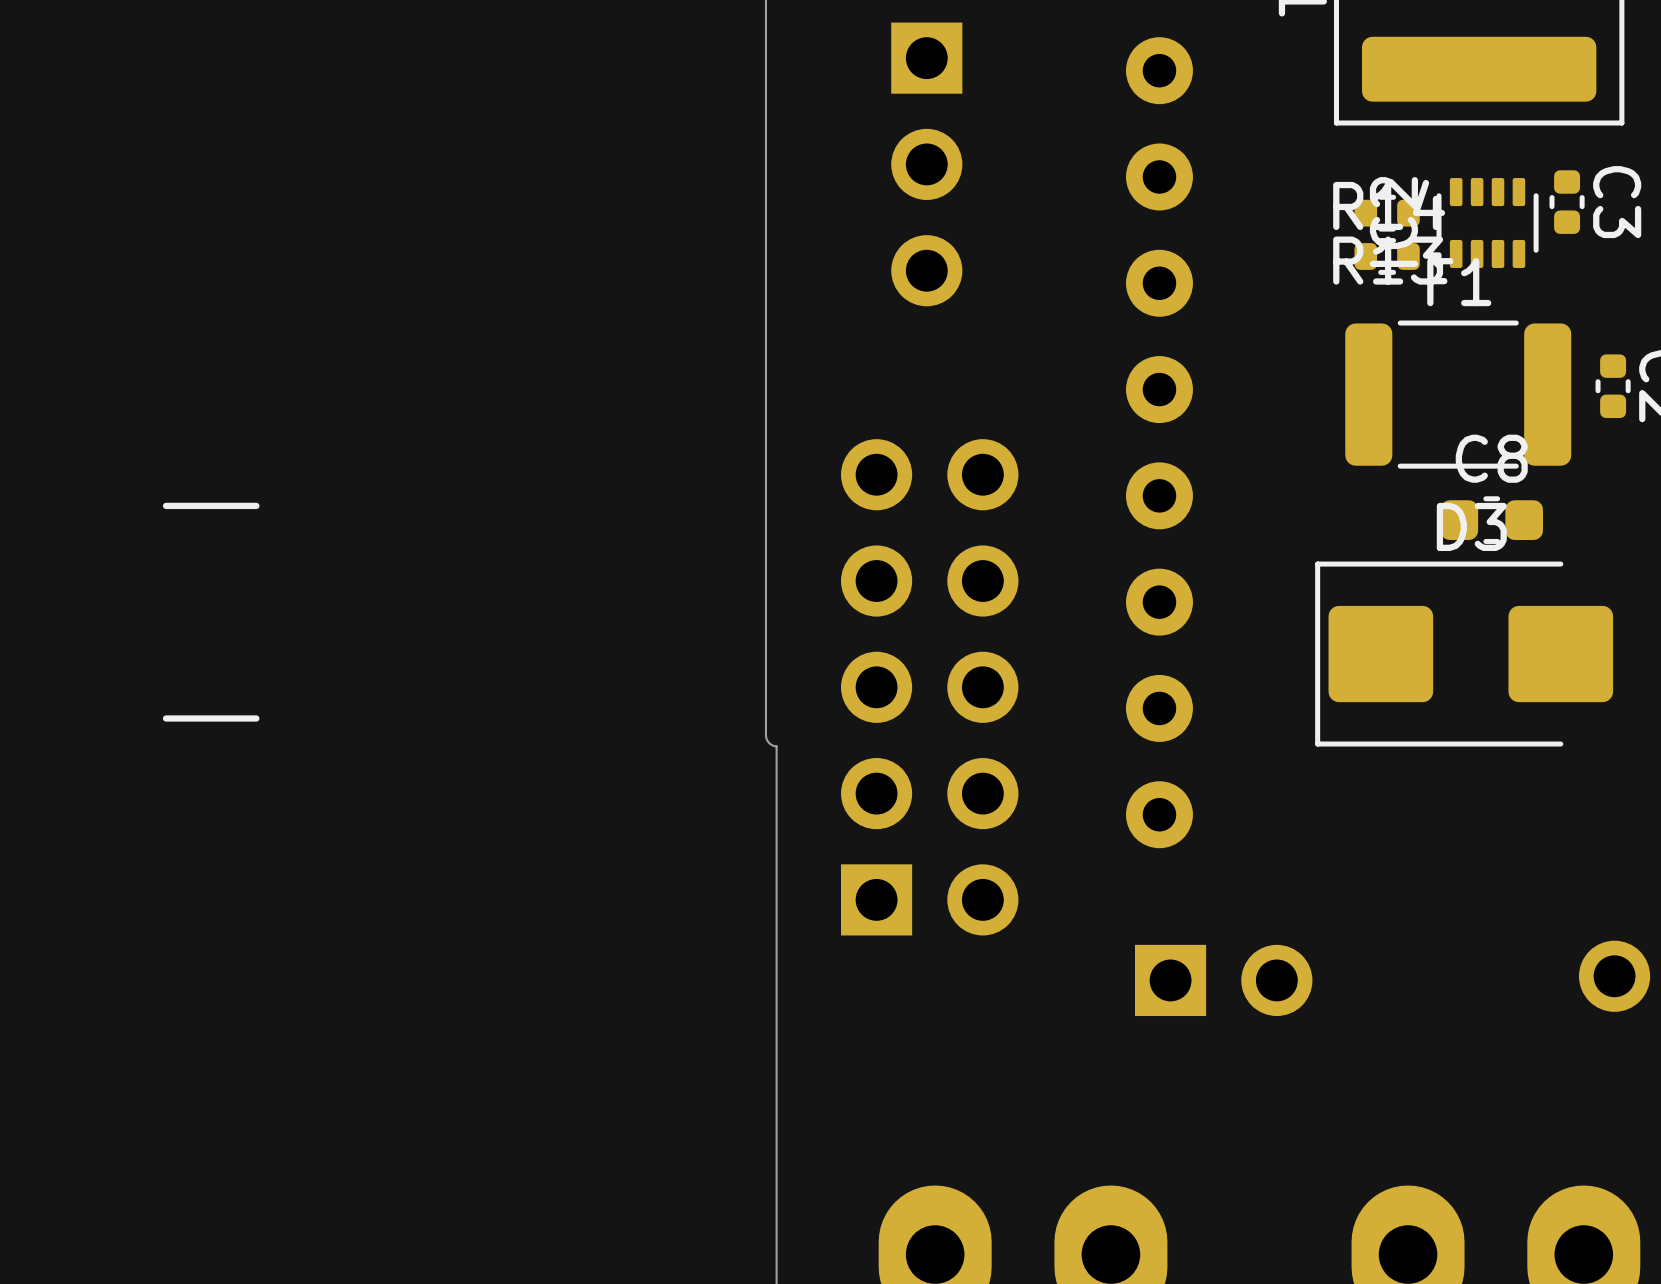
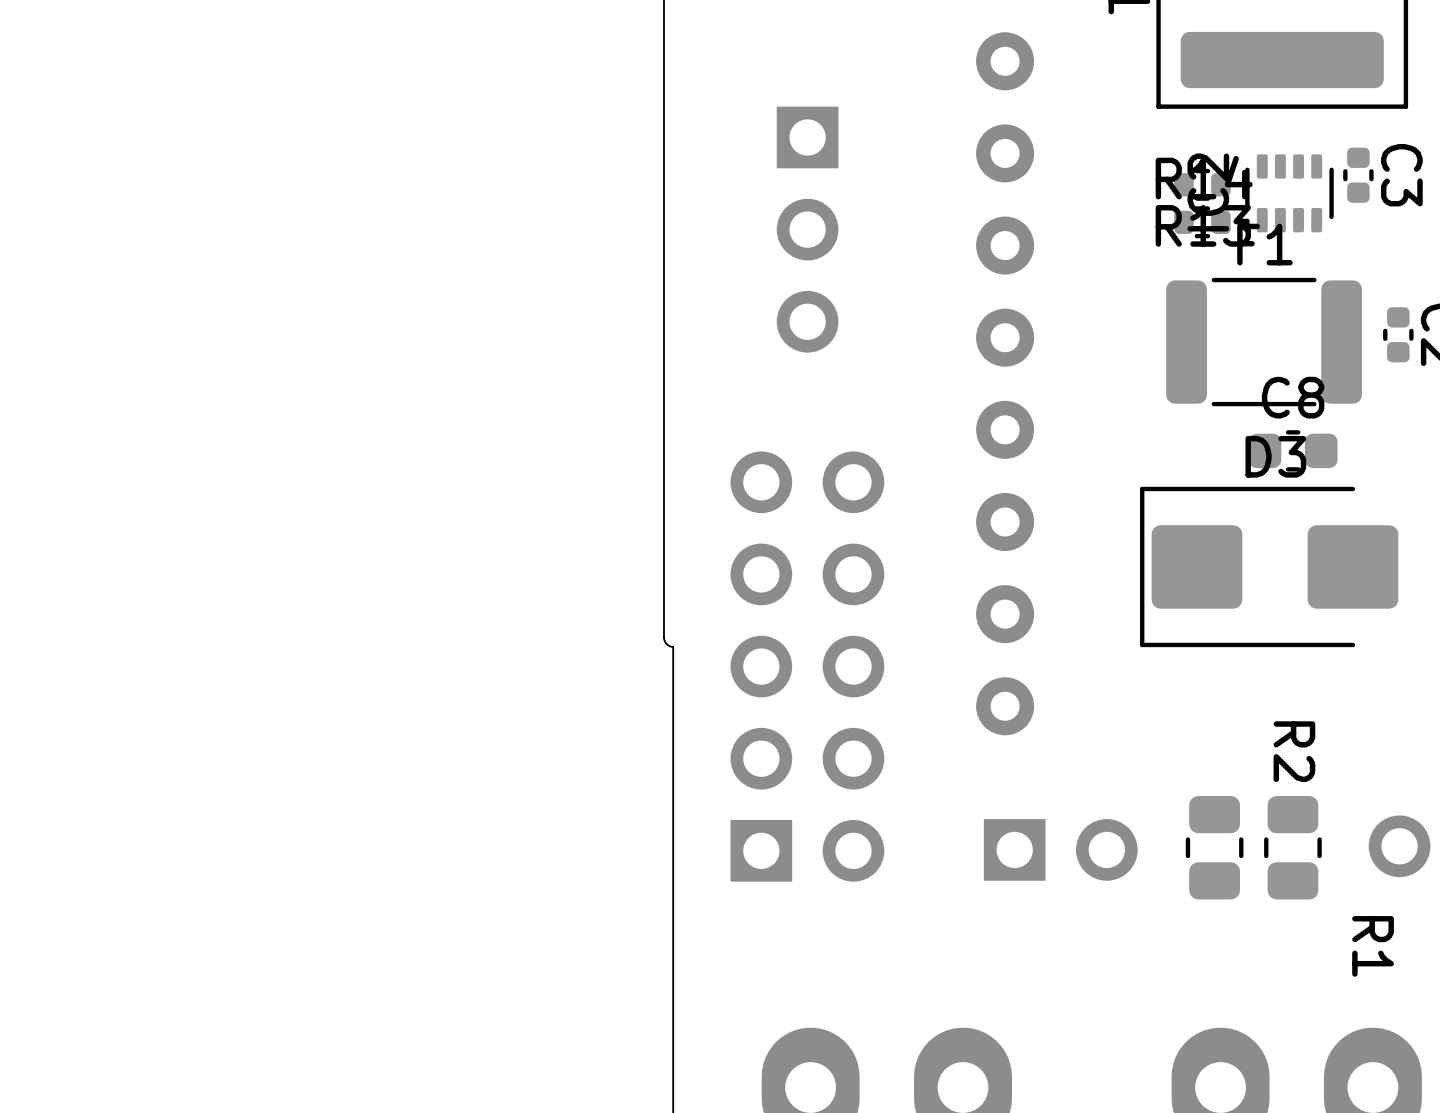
part position: (926, 164) -> (807, 229)
line: (256, 505) (166, 505) -> none
part position: (929, 687) -> (807, 666)
line: (256, 718) (166, 718) -> none
R2: none -> (1214, 847)
R1: none -> (1292, 847)

